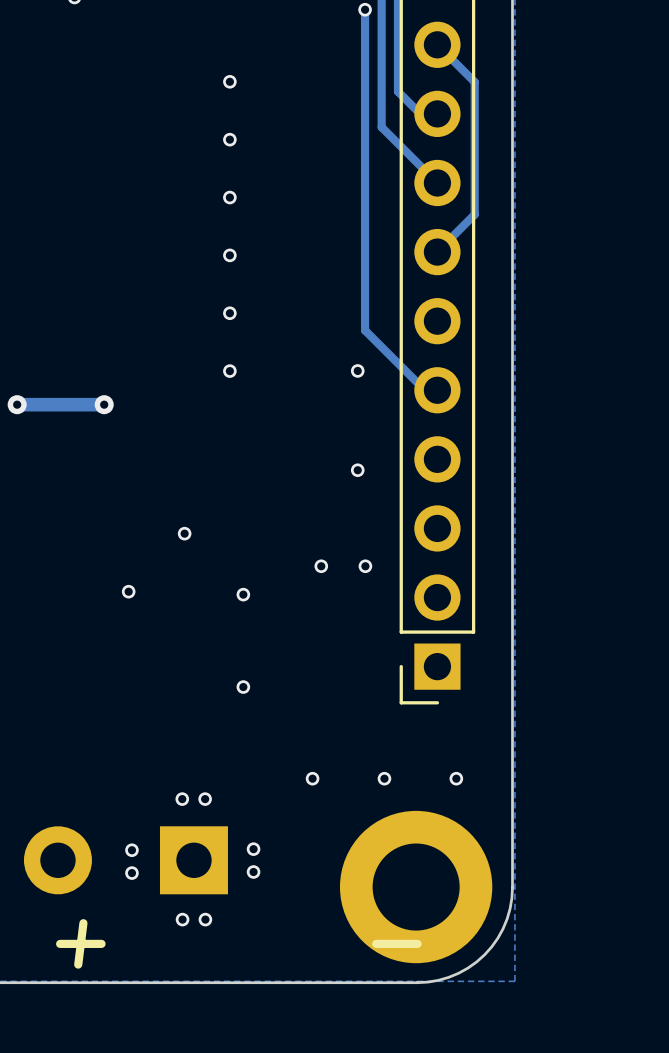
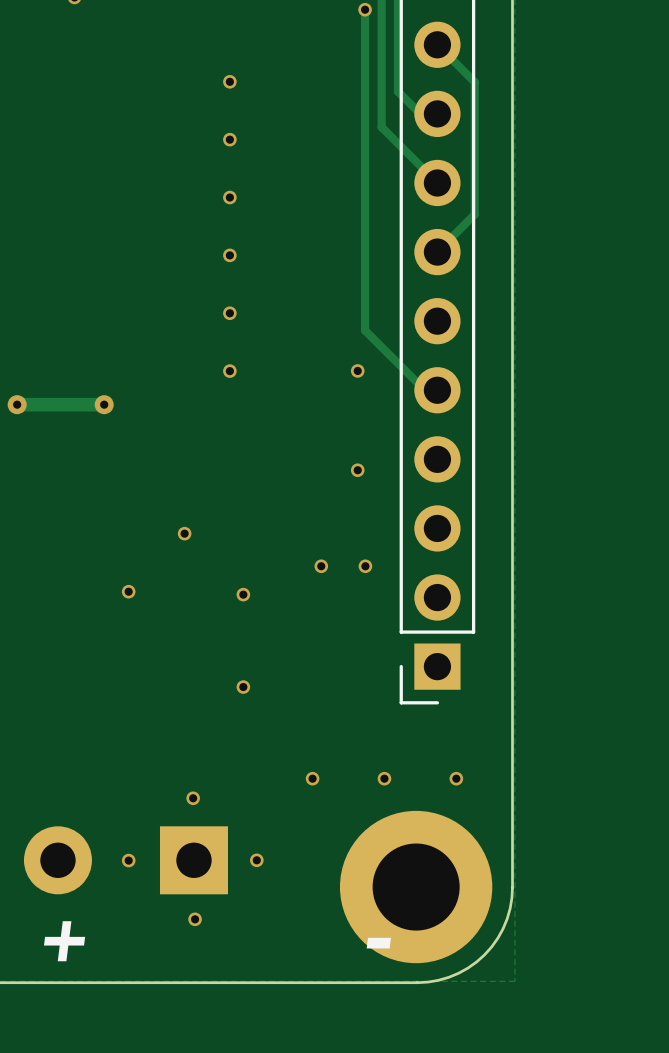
via: none -> (193, 798)
via: (182, 799) -> none
via: (205, 799) -> none
via: (253, 849) -> none
via: (131, 850) -> none
via: none -> (128, 860)
via: none -> (256, 860)
via: (253, 872) -> none
via: (131, 873) -> none
via: (182, 919) -> none
via: none -> (195, 919)
via: (205, 919) -> none

